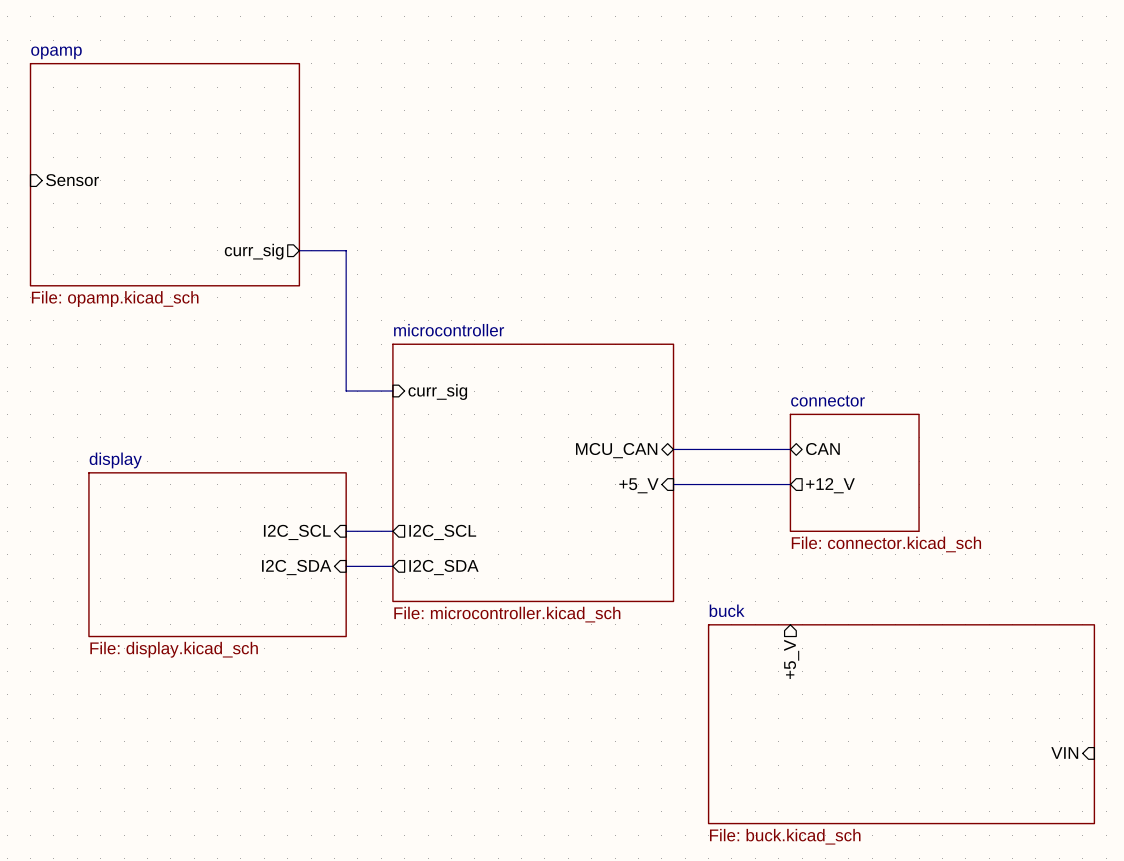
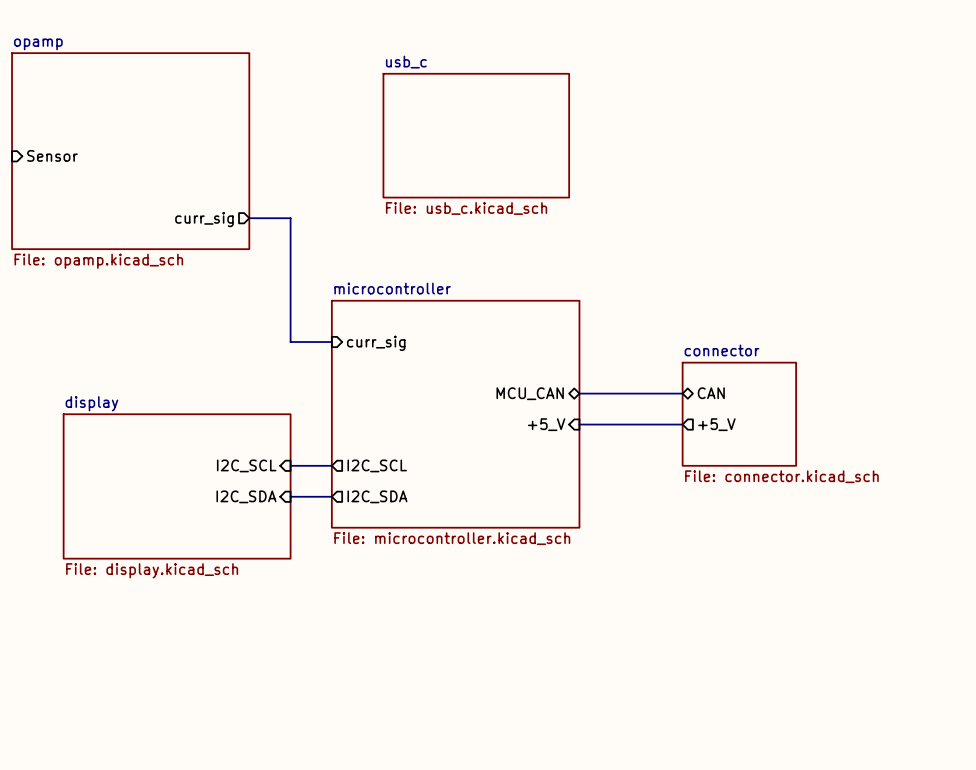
sheet usb_c: none -> File: usb_c.kicad_sch (476, 135)
sheet pin: +12_V (830, 485) -> +5_V (716, 424)
sheet pin: +5_V (791, 659) -> none
sheet buck: File: buck.kicad_sch (901, 724) -> none
sheet pin: VIN (1064, 752) -> none

